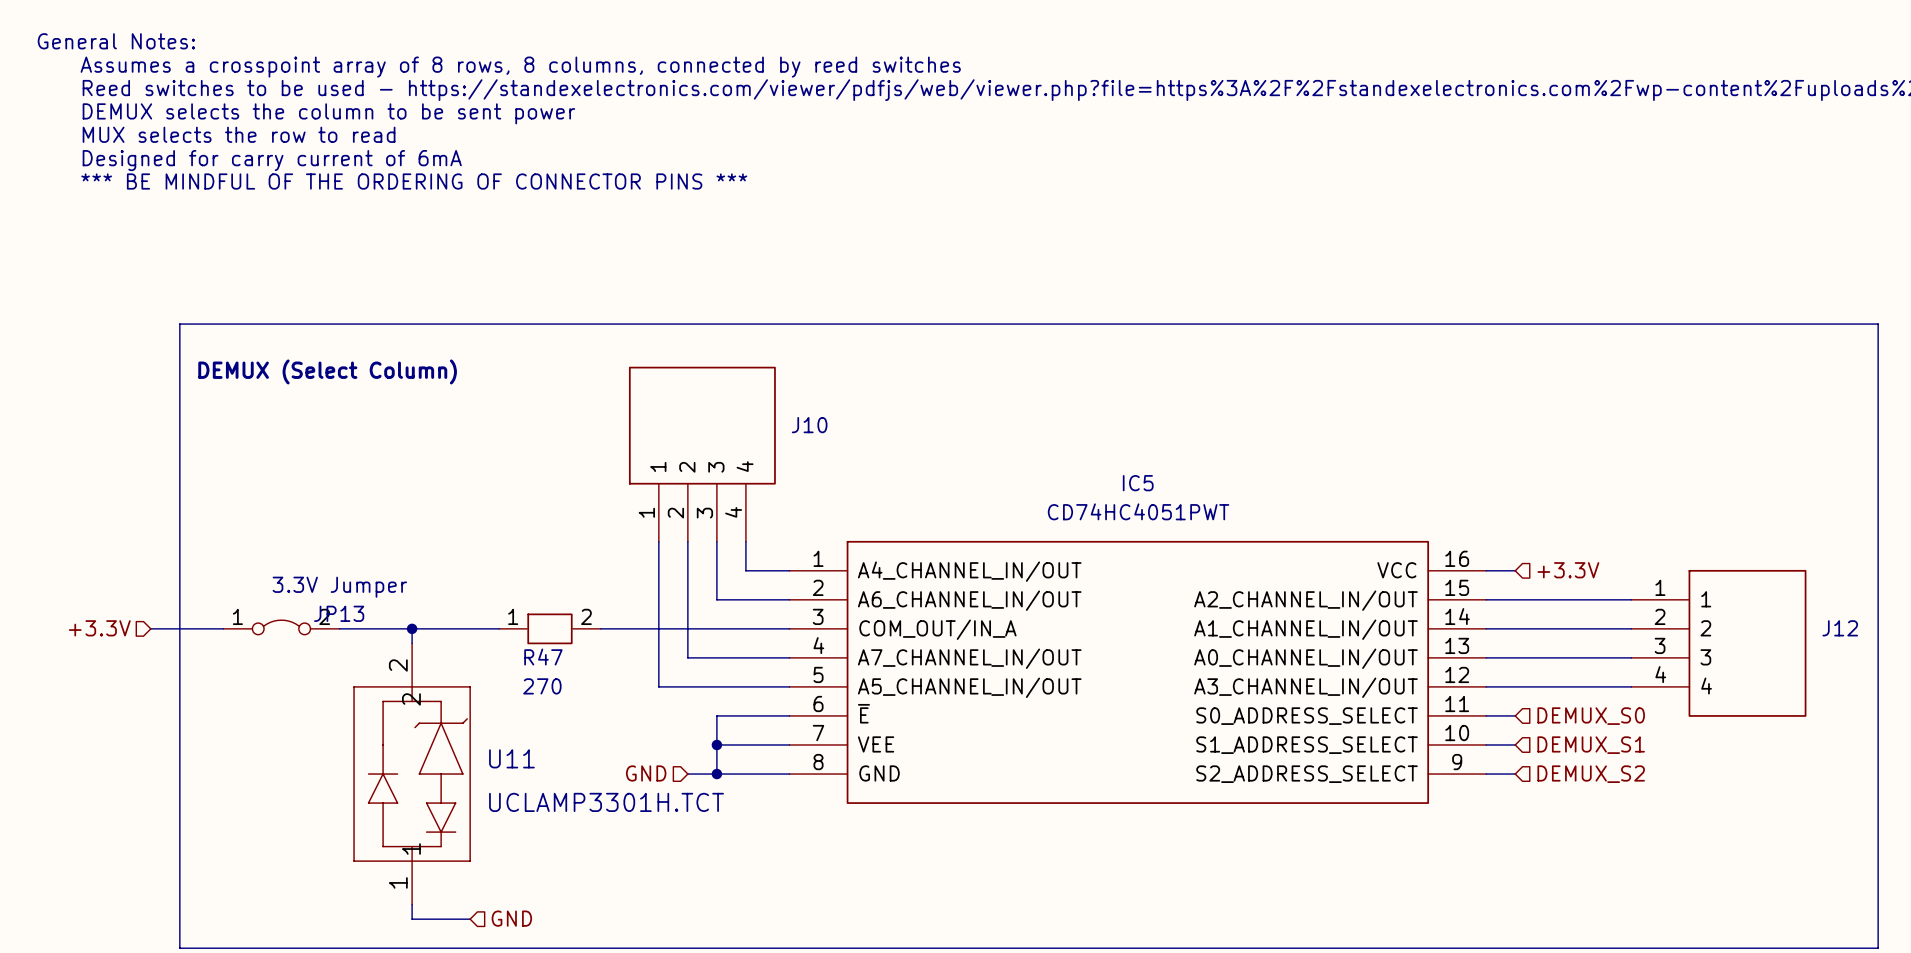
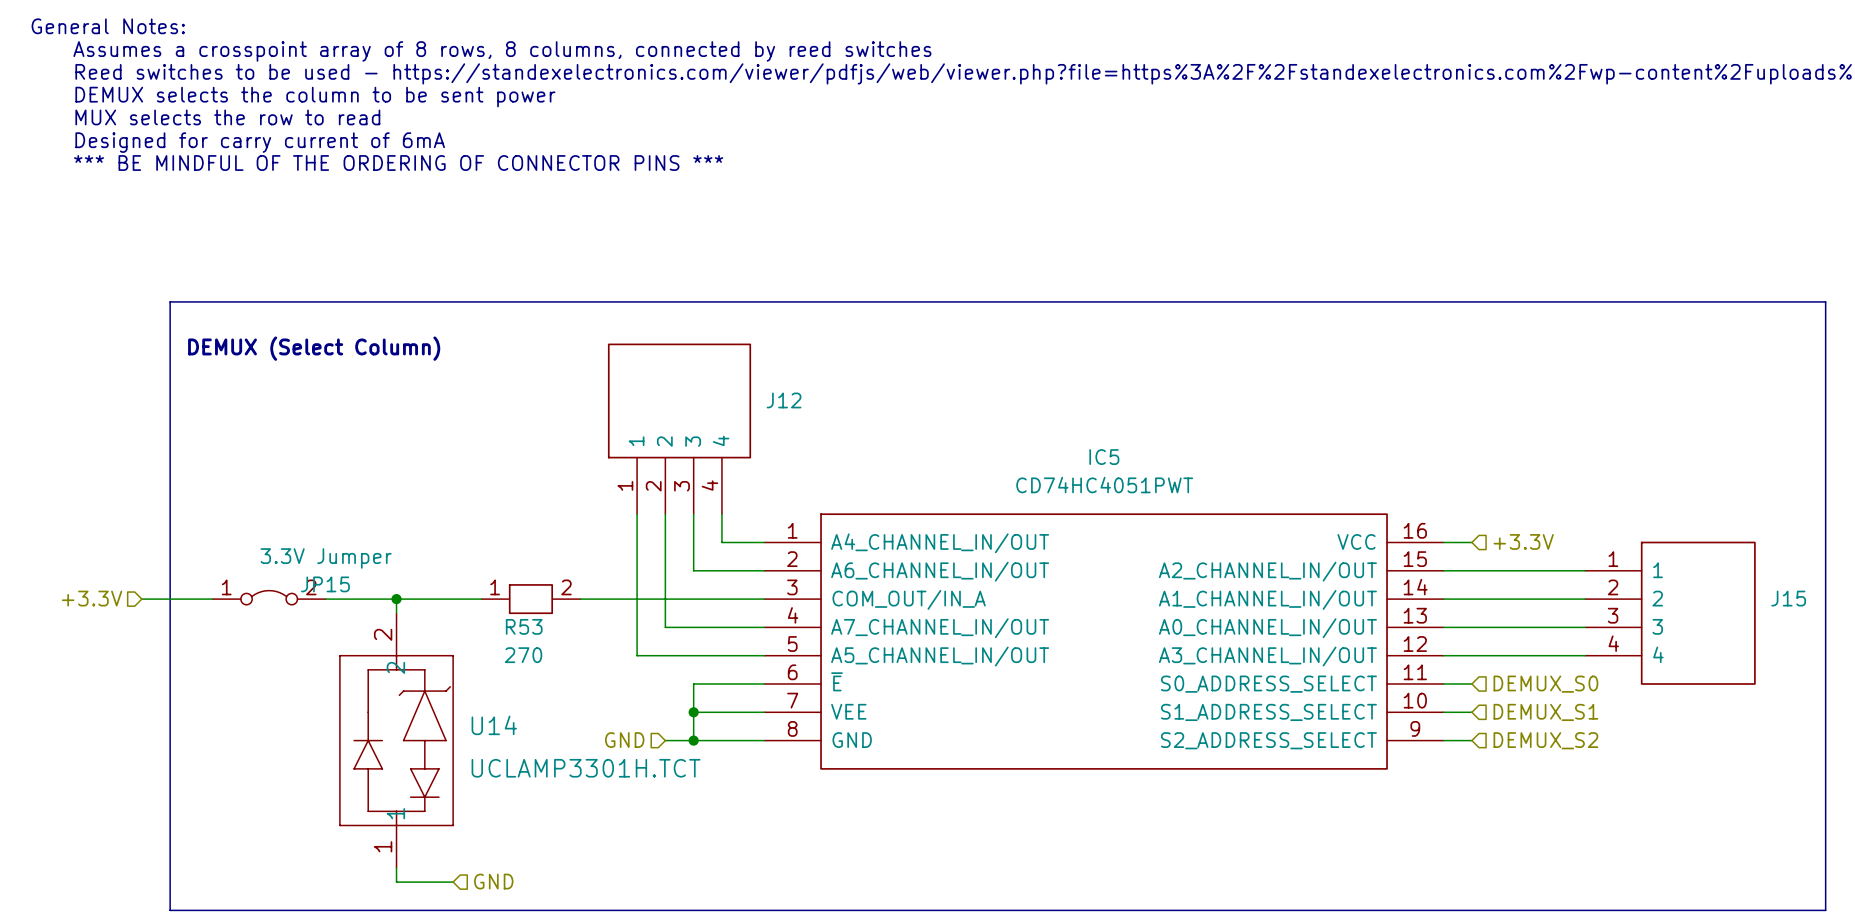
J10 name: J10 (809, 425) -> J12 (784, 400)
JP13 name: JP13 (339, 613) -> JP15 (325, 584)
J12 name: J12 (1840, 628) -> J15 (1788, 598)
R47 name: R47 (543, 657) -> R53 (524, 626)
U11 name: U11 (511, 758) -> U14 (494, 725)

